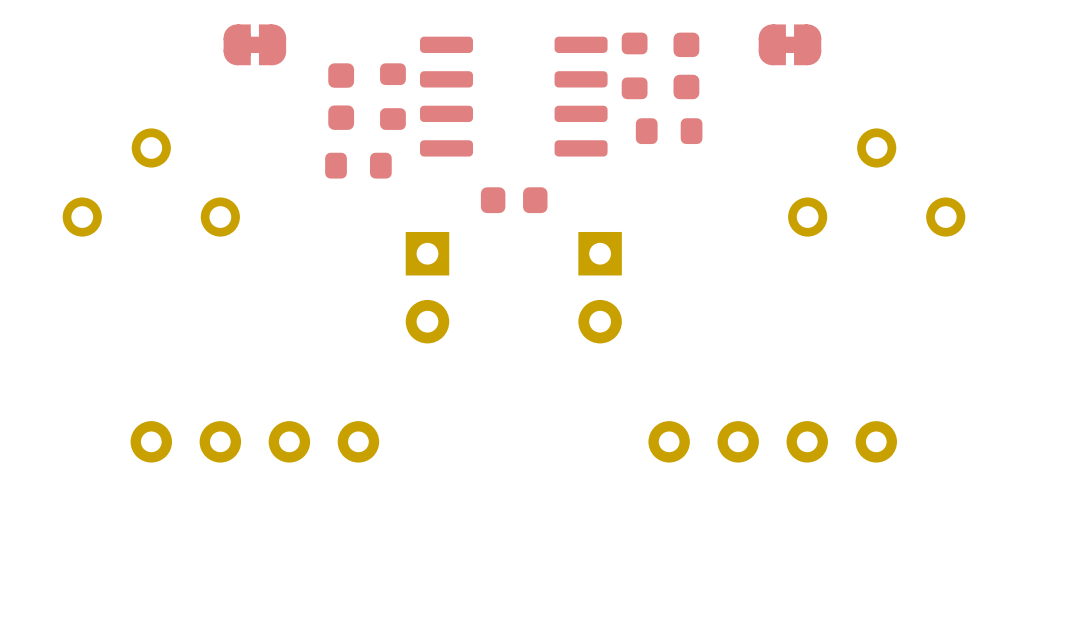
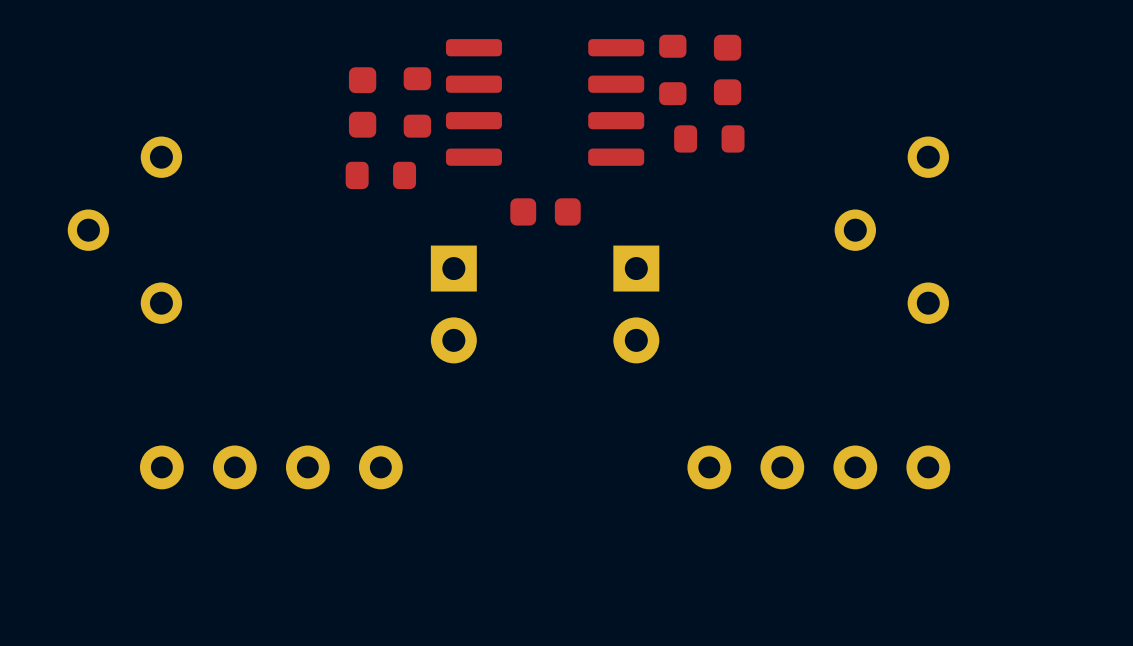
part: (254, 44) -> none
part: (789, 44) -> none
part rotation: 0° (151, 182) -> 90° counterclockwise (124, 230)
part rotation: 0° (876, 182) -> 90° counterclockwise (891, 230)

